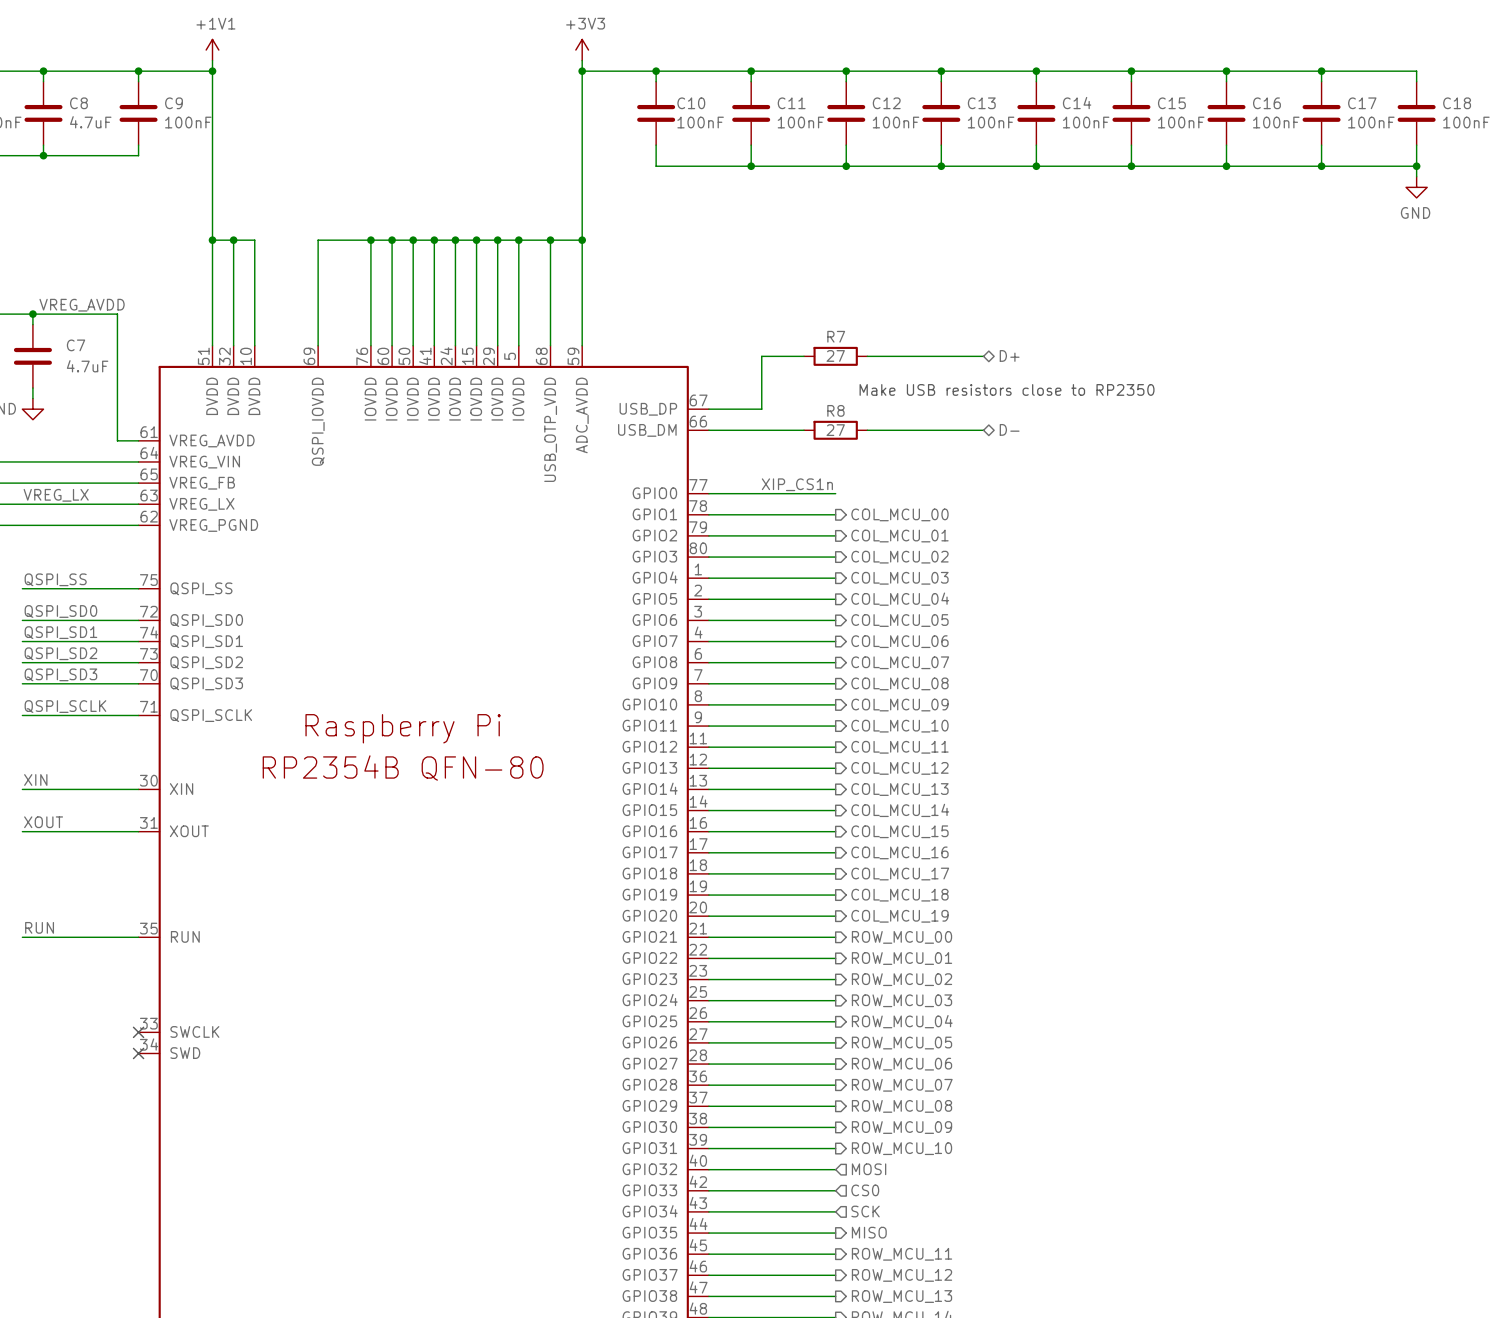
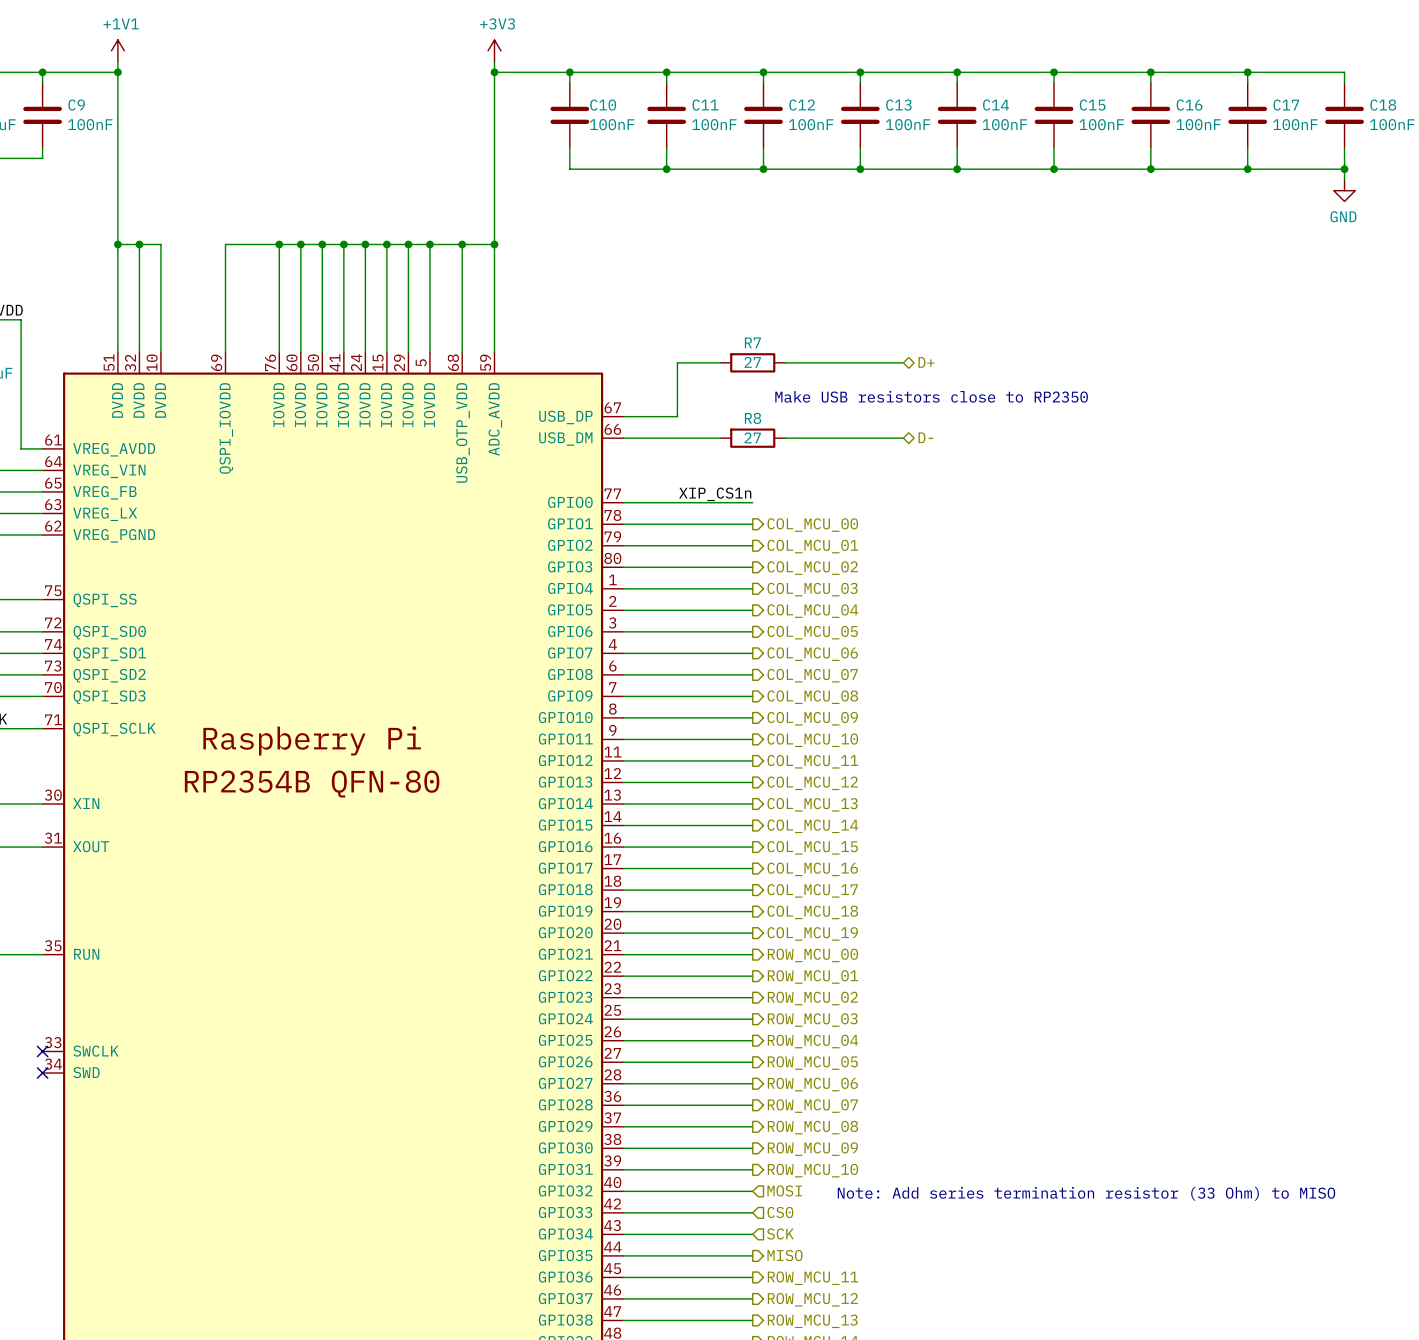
text: none -> Note: Add series termination resistor (33 Ohm) to MISO (1086, 1193)

